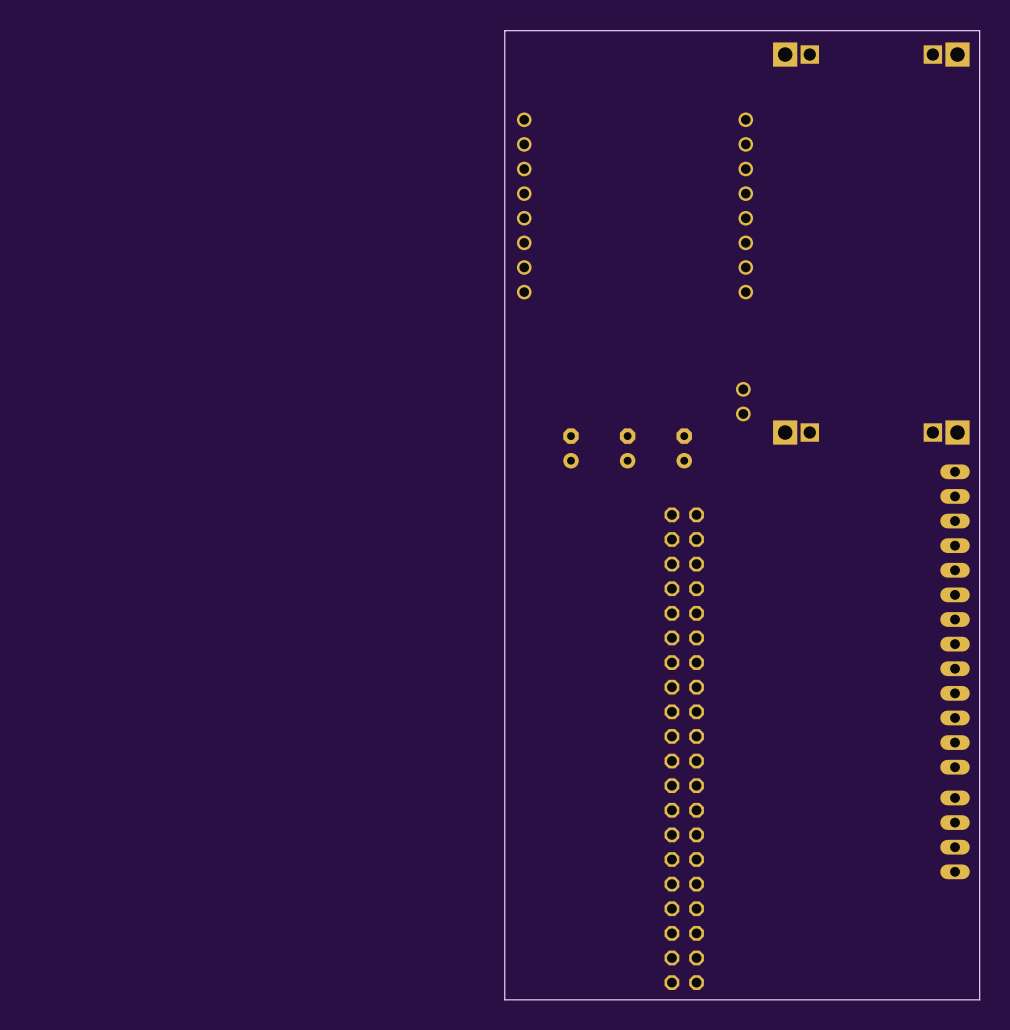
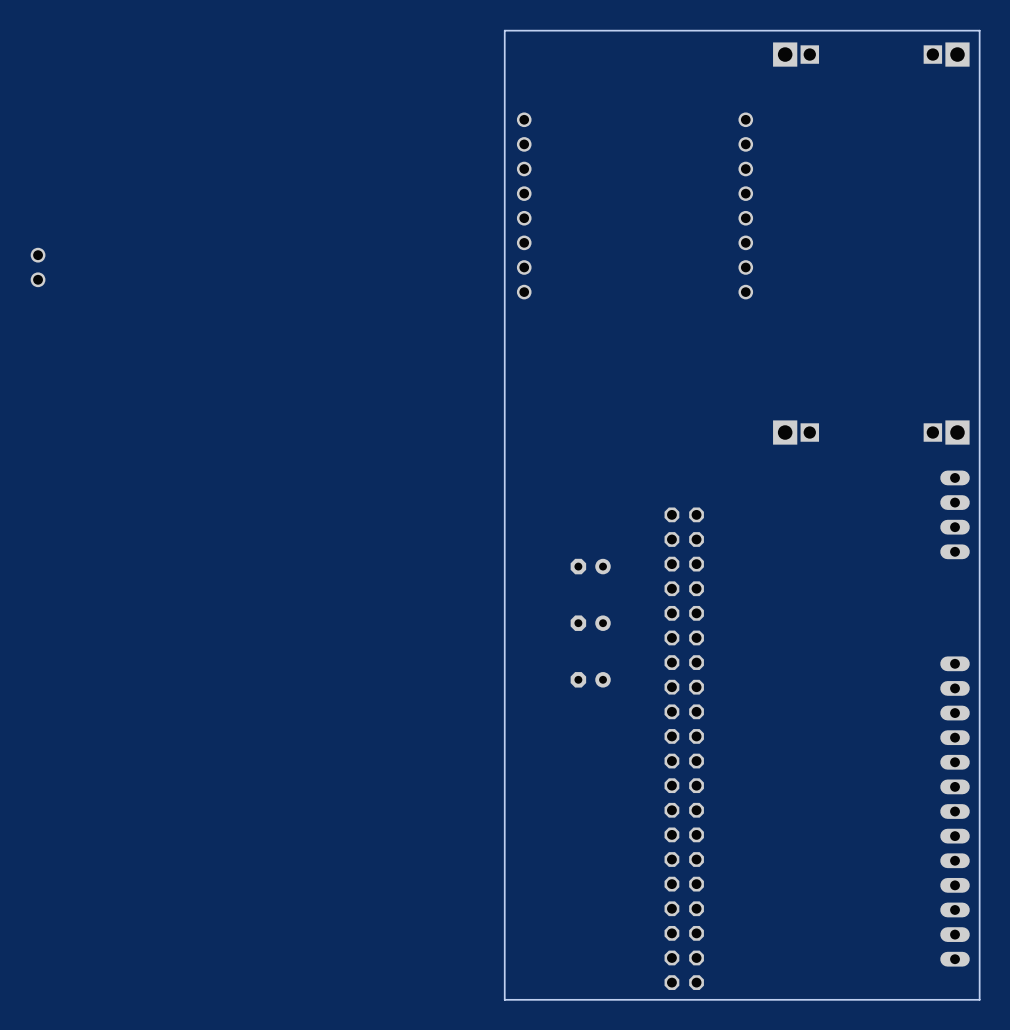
part: none -> (38, 267)
part: (743, 401) -> none
part: (571, 448) -> none
part: (627, 448) -> none
part: (684, 448) -> none
part: none -> (955, 514)
part: none -> (590, 566)
part position: (955, 619) -> (955, 811)
part: none -> (590, 623)
part: none -> (590, 679)
part: (955, 834) -> none

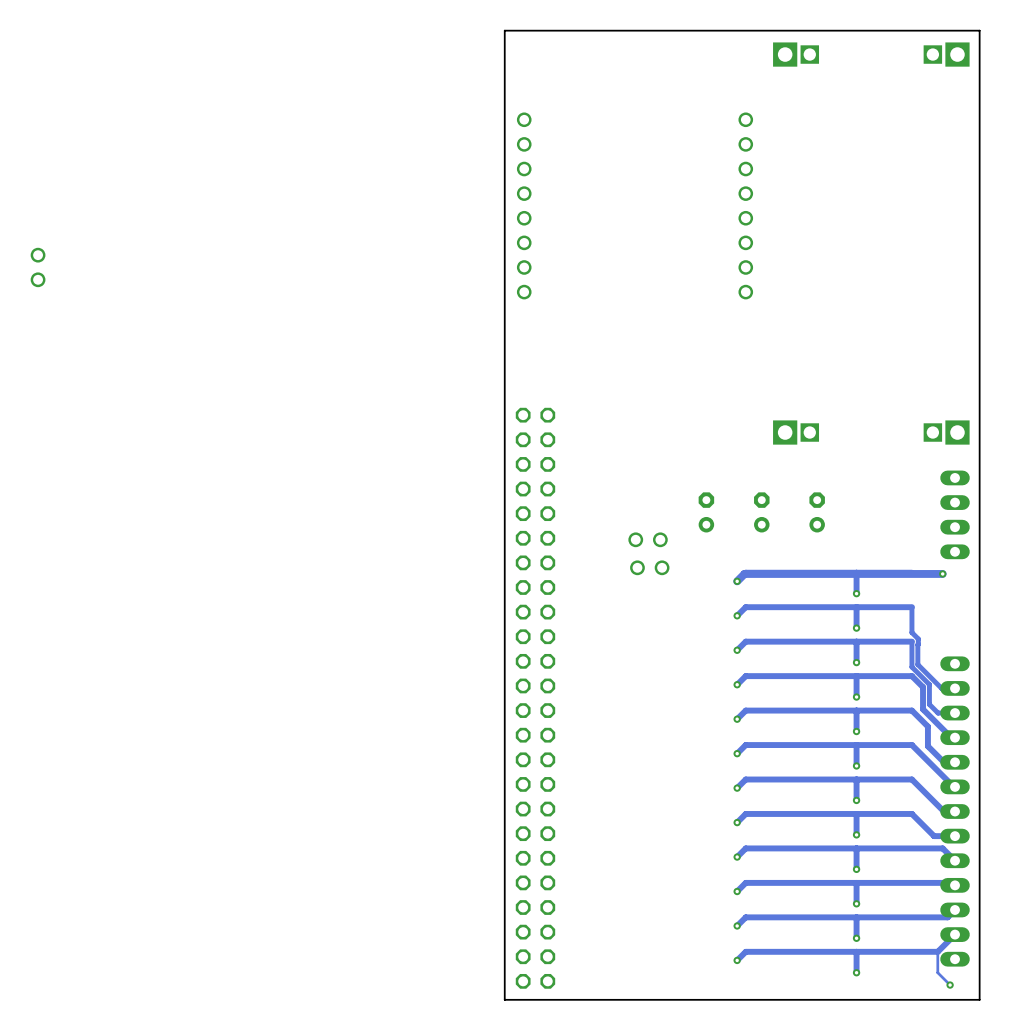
part: none -> (706, 512)
part: none -> (761, 512)
part: none -> (817, 512)
part: none -> (648, 539)
part: (590, 566) -> none
part: none -> (649, 567)
track: none -> (856, 572) (856, 593)
track: none -> (911, 572) (745, 572) (737, 581) (744, 573) (942, 573)
via: none -> (942, 573)
via: none -> (737, 581)
via: none -> (856, 593)
track: none -> (856, 607) (856, 628)
track: none -> (737, 615) (745, 607) (911, 607) (911, 632) (918, 639) (917, 664) (941, 688) (955, 688)
via: none -> (737, 615)
part: (590, 623) -> none
via: none -> (856, 628)
track: none -> (856, 641) (856, 662)
track: none -> (737, 650) (745, 641) (911, 641) (911, 667) (929, 684) (929, 704) (938, 713) (955, 713)
via: none -> (737, 650)
via: none -> (856, 662)
track: none -> (856, 676) (856, 697)
part: (590, 679) -> none
track: none -> (737, 684) (745, 676) (911, 676) (923, 687) (923, 709) (951, 737) (955, 737)
via: none -> (737, 684)
via: none -> (856, 697)
part: none -> (535, 698)
track: none -> (856, 710) (856, 731)
track: none -> (737, 719) (745, 710) (911, 710) (927, 726) (927, 746) (943, 762) (955, 762)
via: none -> (737, 719)
via: none -> (856, 731)
track: none -> (856, 745) (856, 765)
part: (684, 748) -> none
track: none -> (737, 753) (745, 745) (911, 745) (955, 786)
via: none -> (737, 753)
via: none -> (856, 765)
track: none -> (856, 779) (856, 800)
track: none -> (737, 788) (745, 779) (911, 779) (943, 811) (955, 811)
via: none -> (737, 788)
via: none -> (856, 800)
track: none -> (856, 813) (856, 834)
track: none -> (737, 822) (745, 813) (911, 813) (934, 836) (955, 836)
via: none -> (737, 822)
via: none -> (856, 834)
track: none -> (856, 848) (856, 869)
track: none -> (737, 857) (745, 848) (942, 848) (955, 860)
via: none -> (737, 857)
via: none -> (856, 869)
track: none -> (856, 882) (856, 903)
track: none -> (955, 885) (952, 882) (745, 882) (737, 891)
via: none -> (737, 891)
via: none -> (856, 903)
track: none -> (955, 909) (947, 917) (745, 917) (737, 925)
track: none -> (856, 917) (856, 938)
via: none -> (737, 925)
track: none -> (955, 934) (937, 951)
via: none -> (856, 938)
track: none -> (856, 951) (856, 972)
track: none -> (937, 951) (745, 951) (737, 960)
track: none -> (937, 951) (937, 972) (950, 985)
via: none -> (737, 960)
via: none -> (856, 972)
via: none -> (950, 985)

